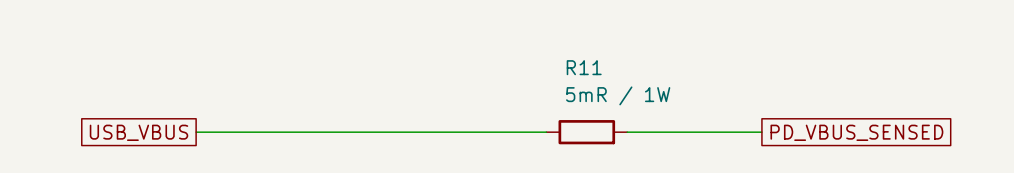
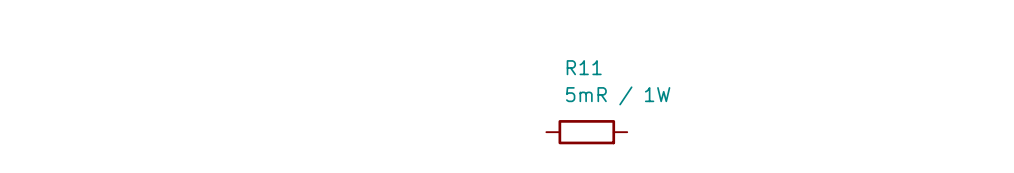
global label: USB_VBUS (138, 132) -> none
wire: (196, 132) (546, 132) -> none
wire: (627, 132) (761, 132) -> none
global label: PD_VBUS_SENSED (856, 132) -> none

